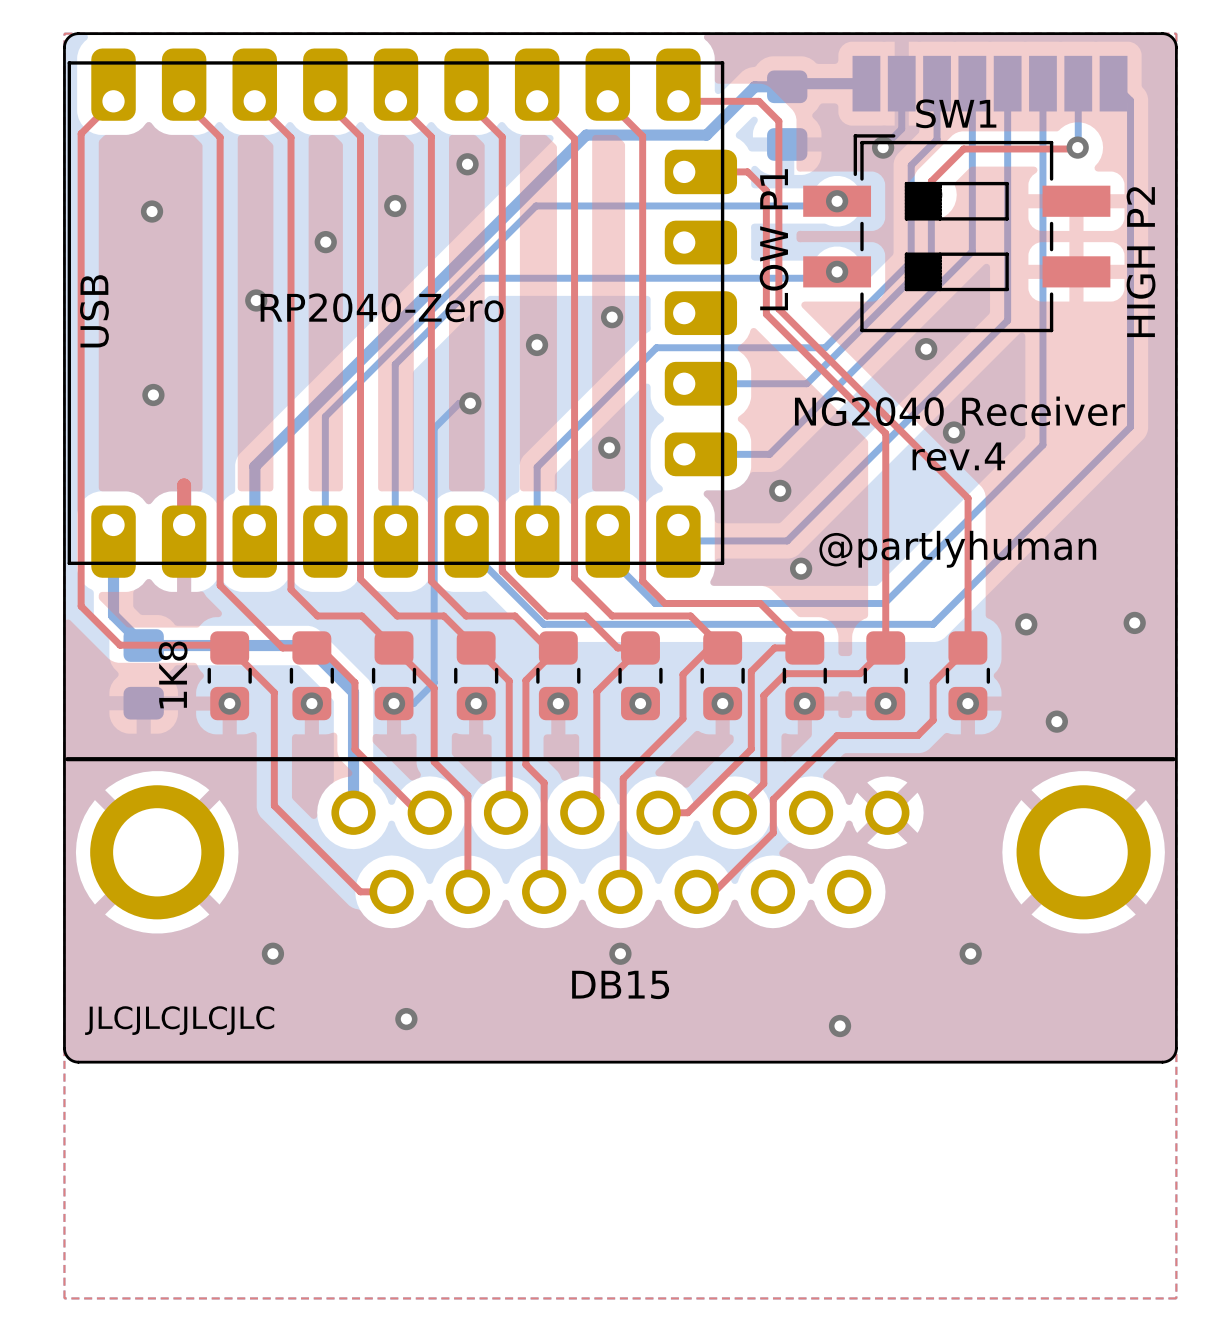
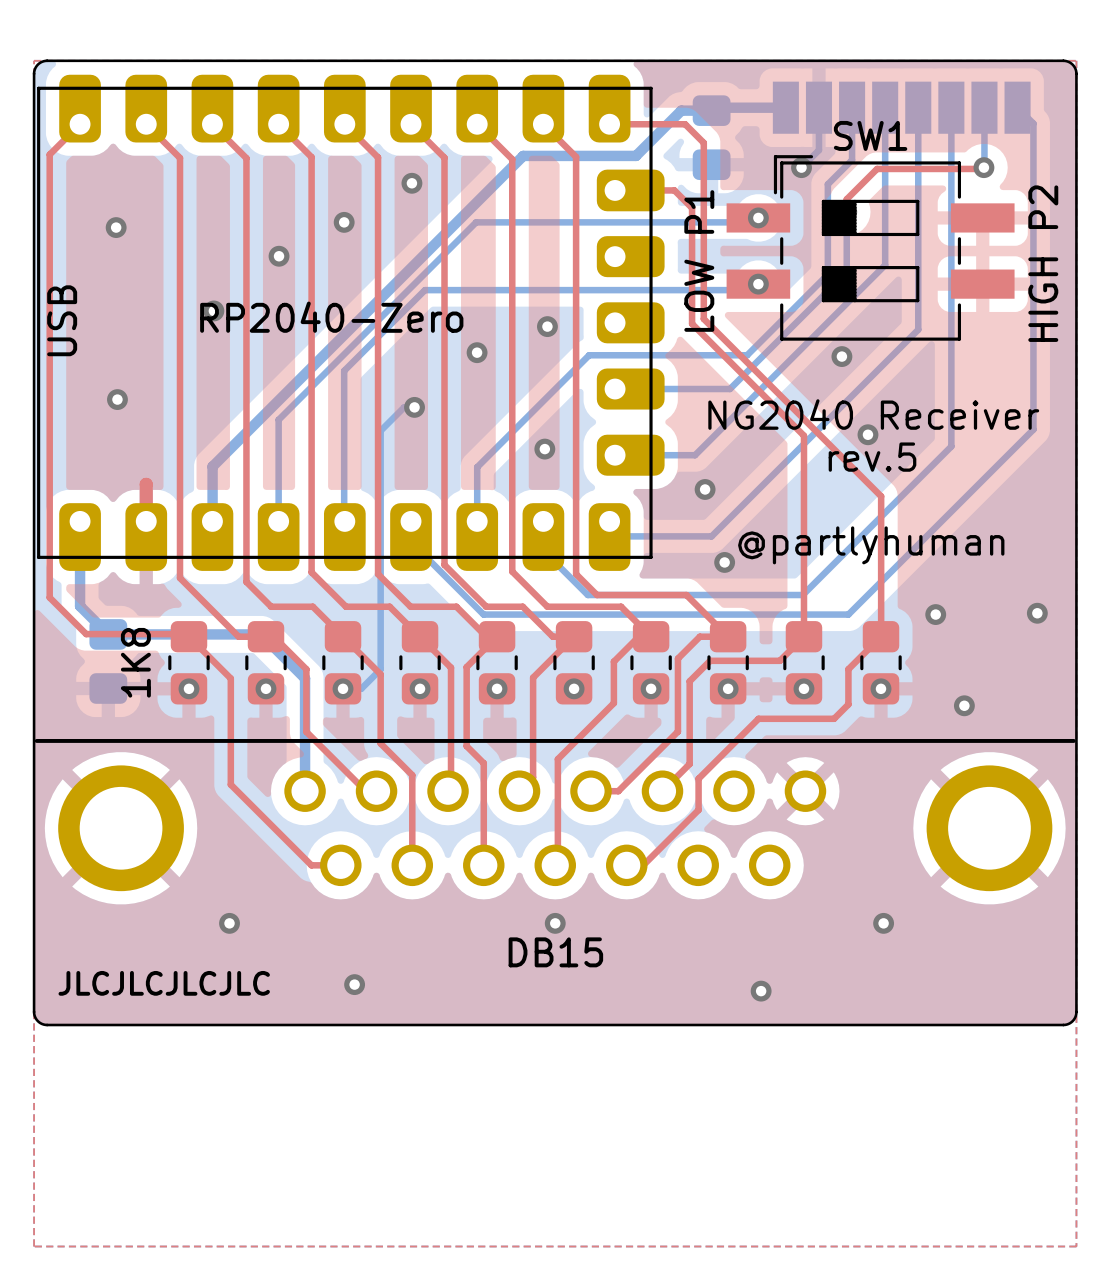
text: rev.4 (958, 456) -> rev.5 (872, 457)

